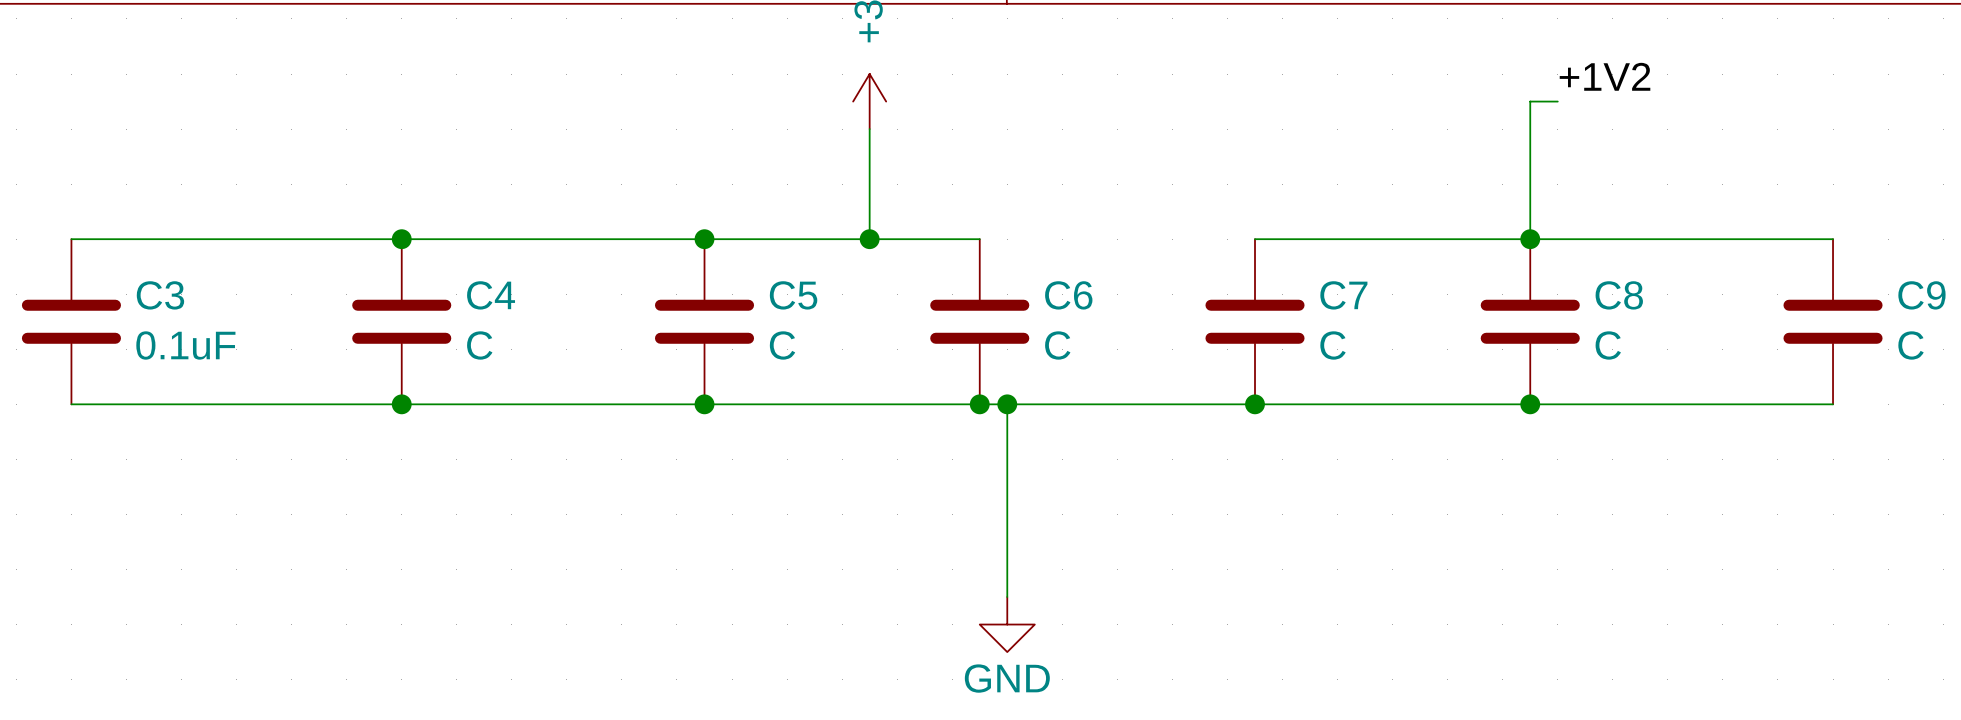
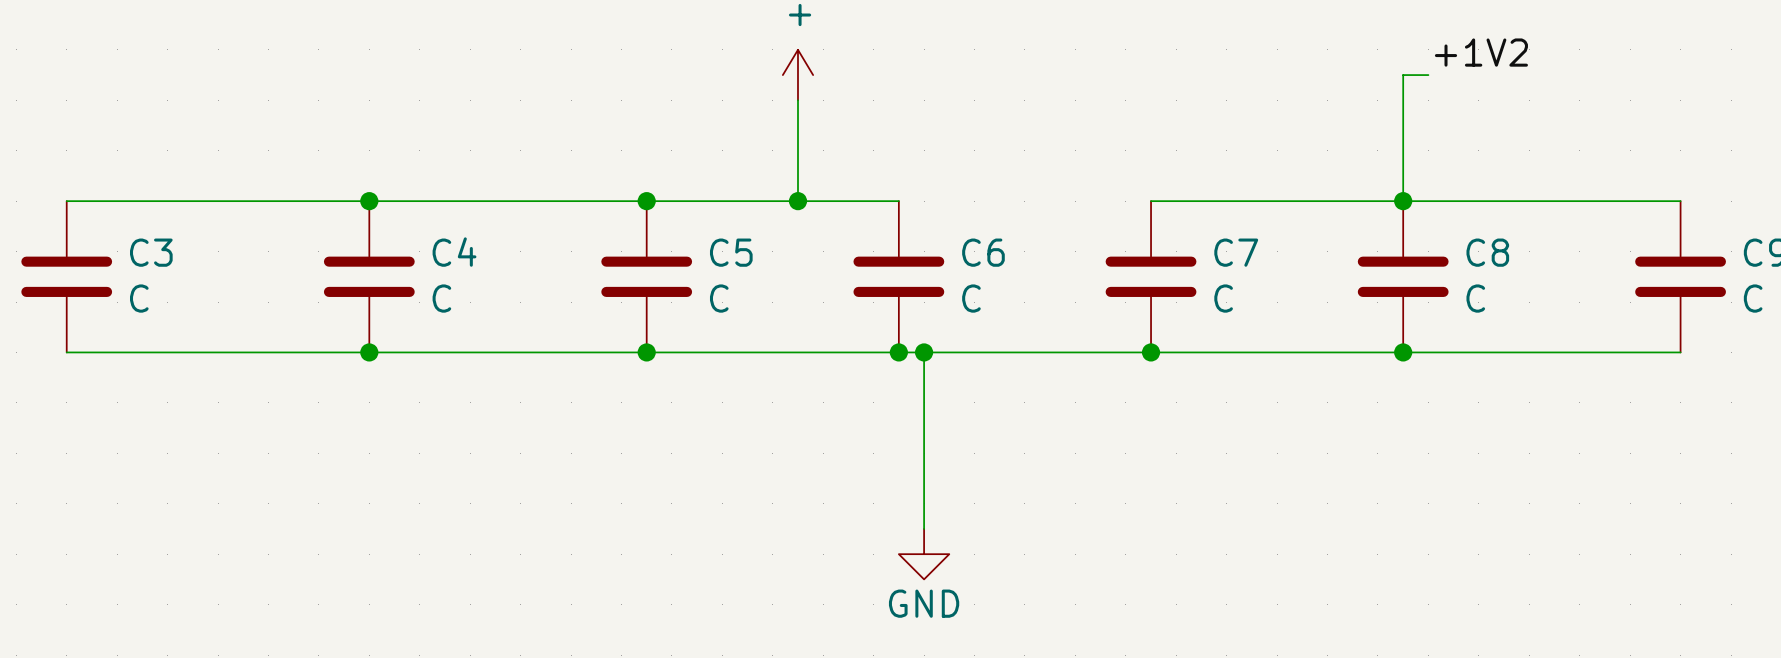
C3 value: 0.1uF (185, 345) -> C (139, 298)

